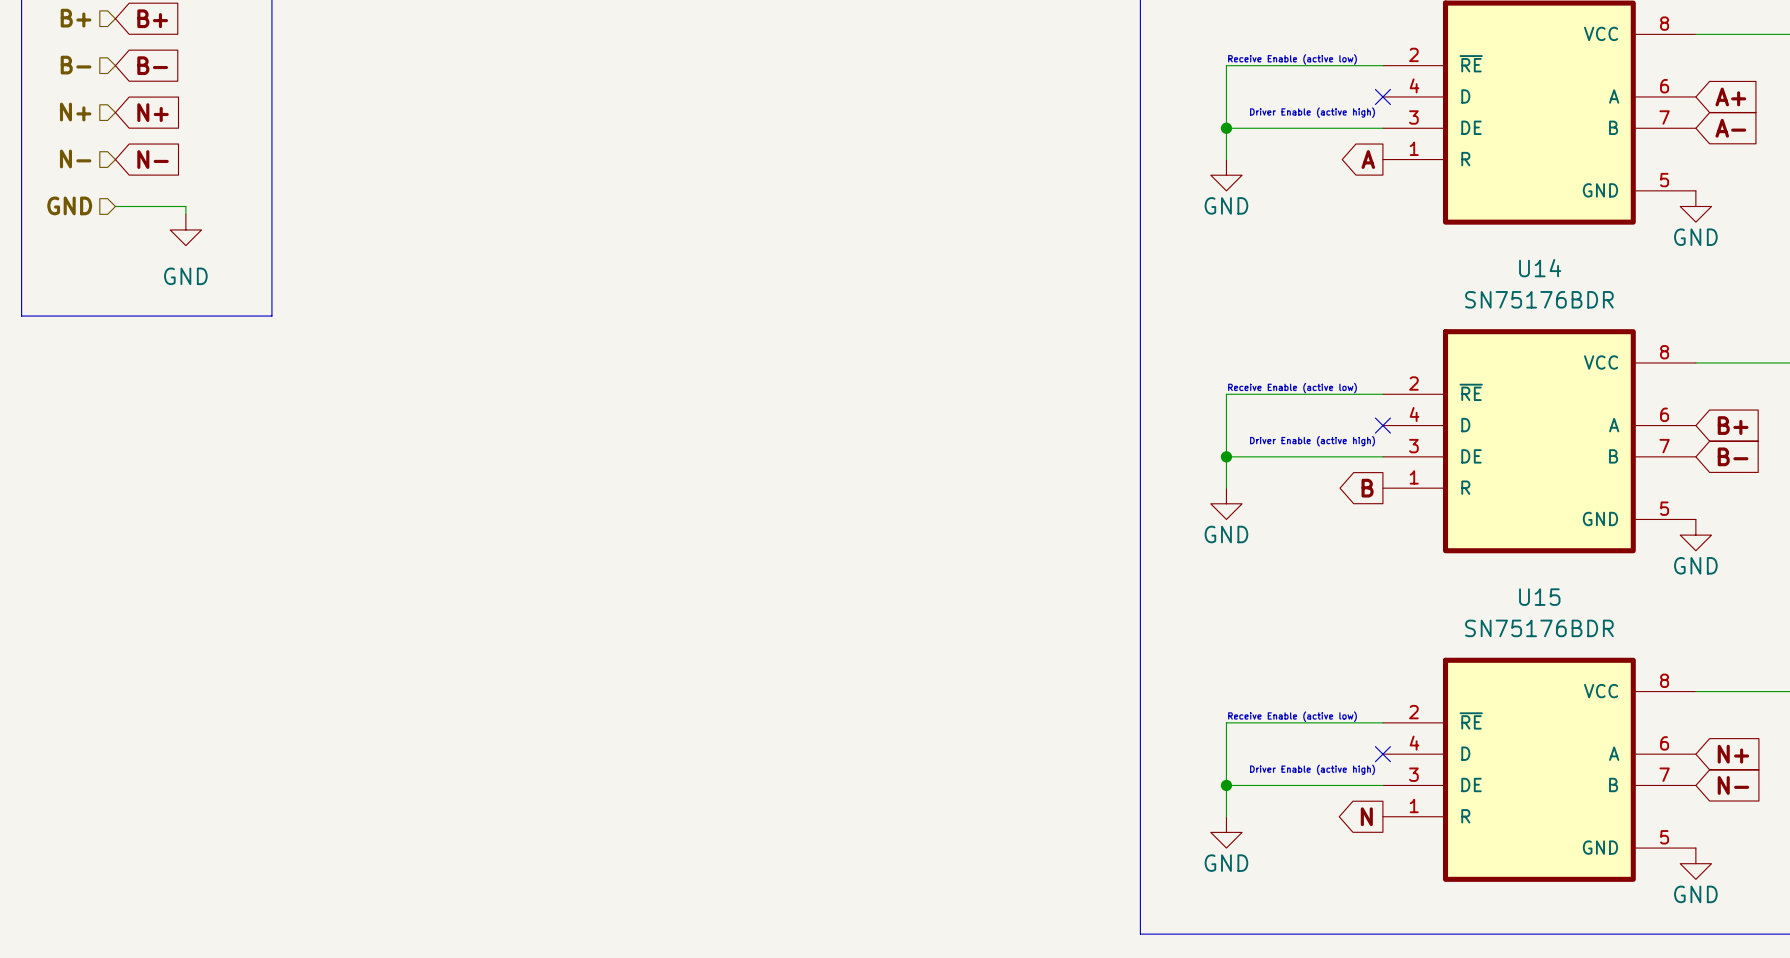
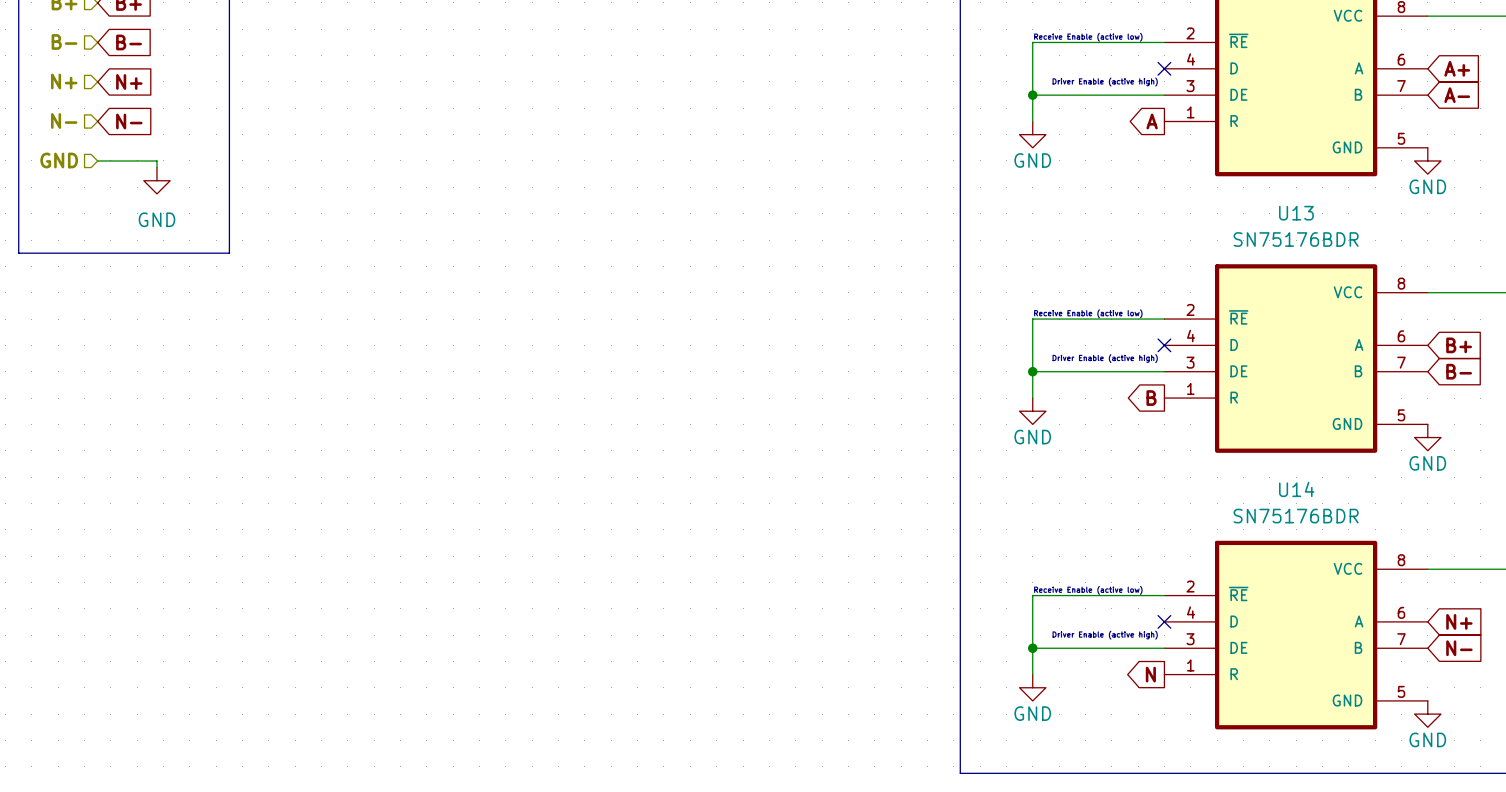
U14 name: U14 (1540, 268) -> U13 (1296, 213)
U15 name: U15 (1539, 597) -> U14 (1296, 489)

